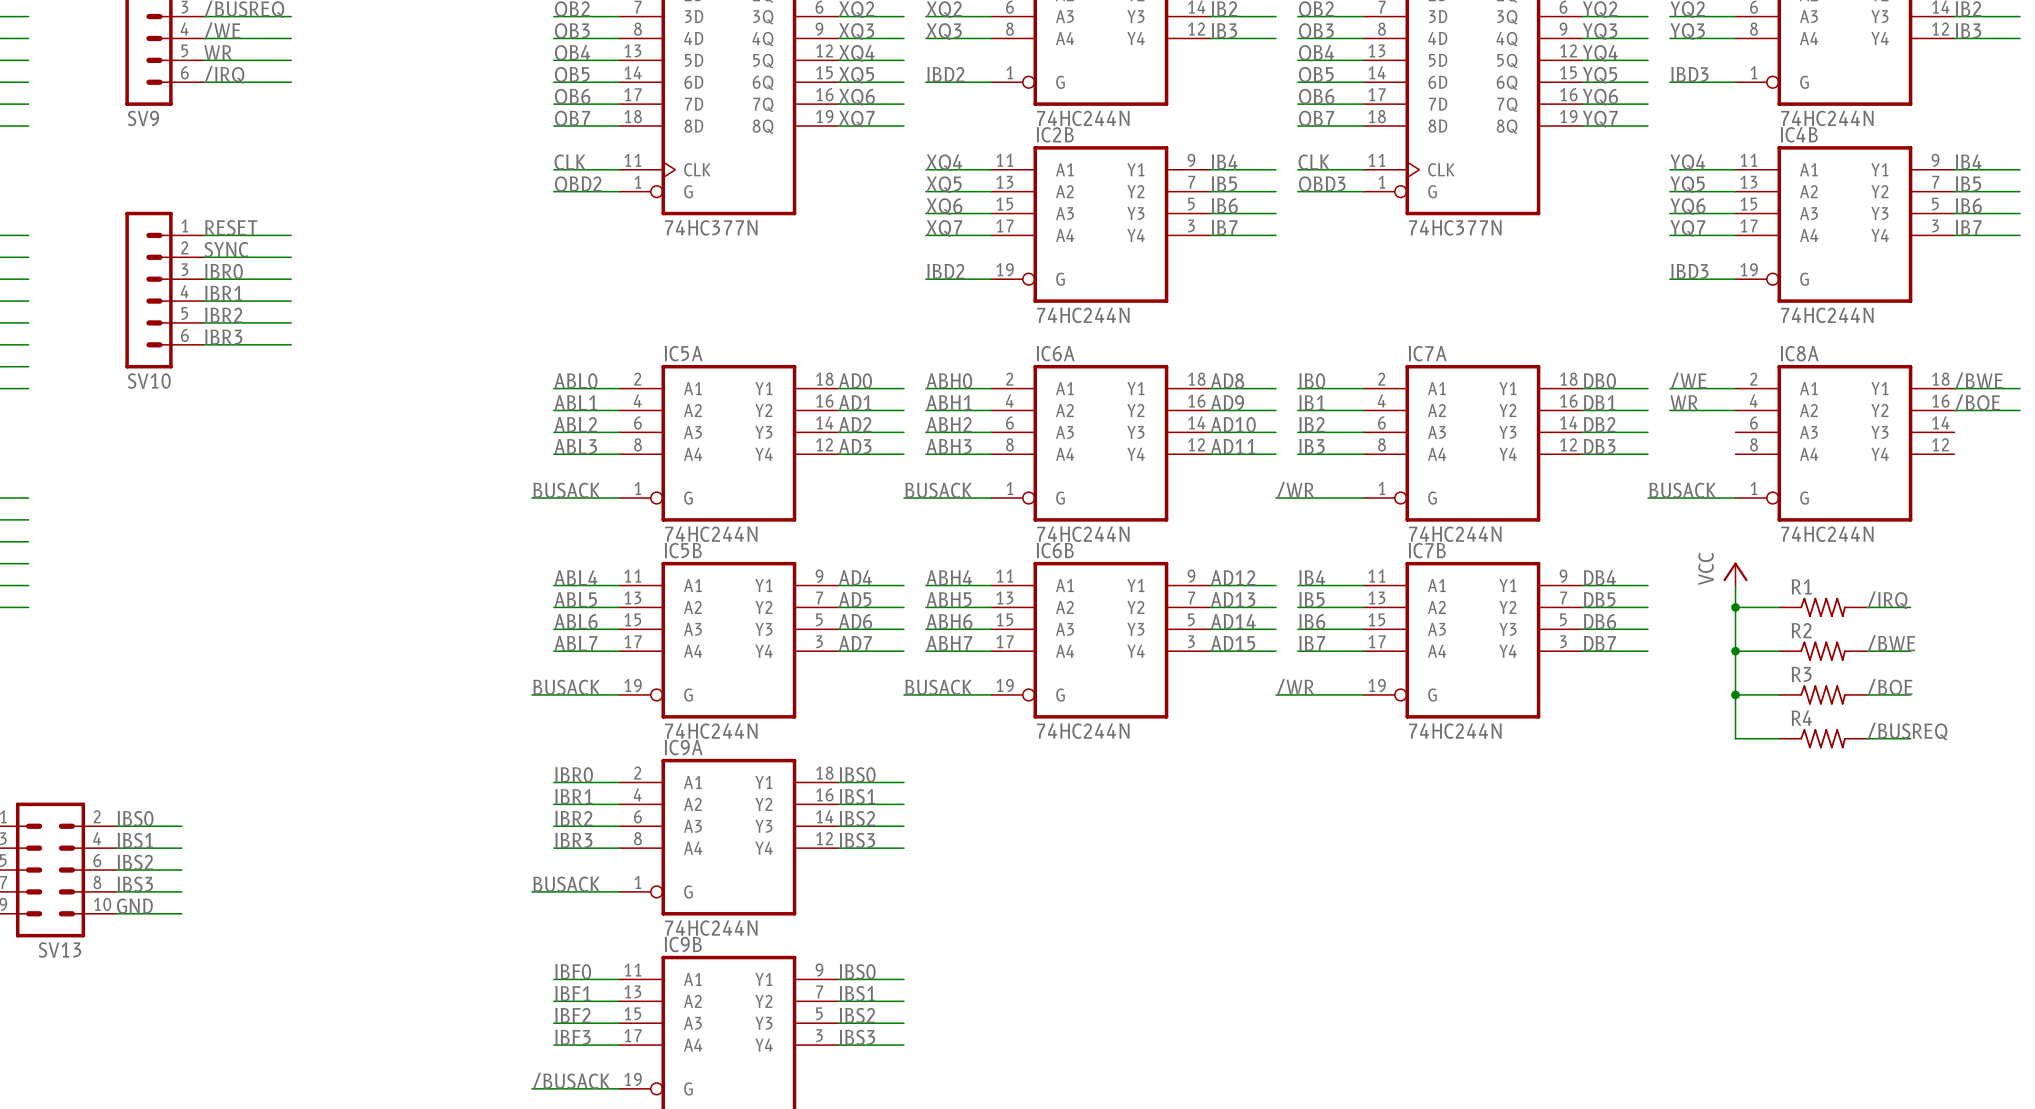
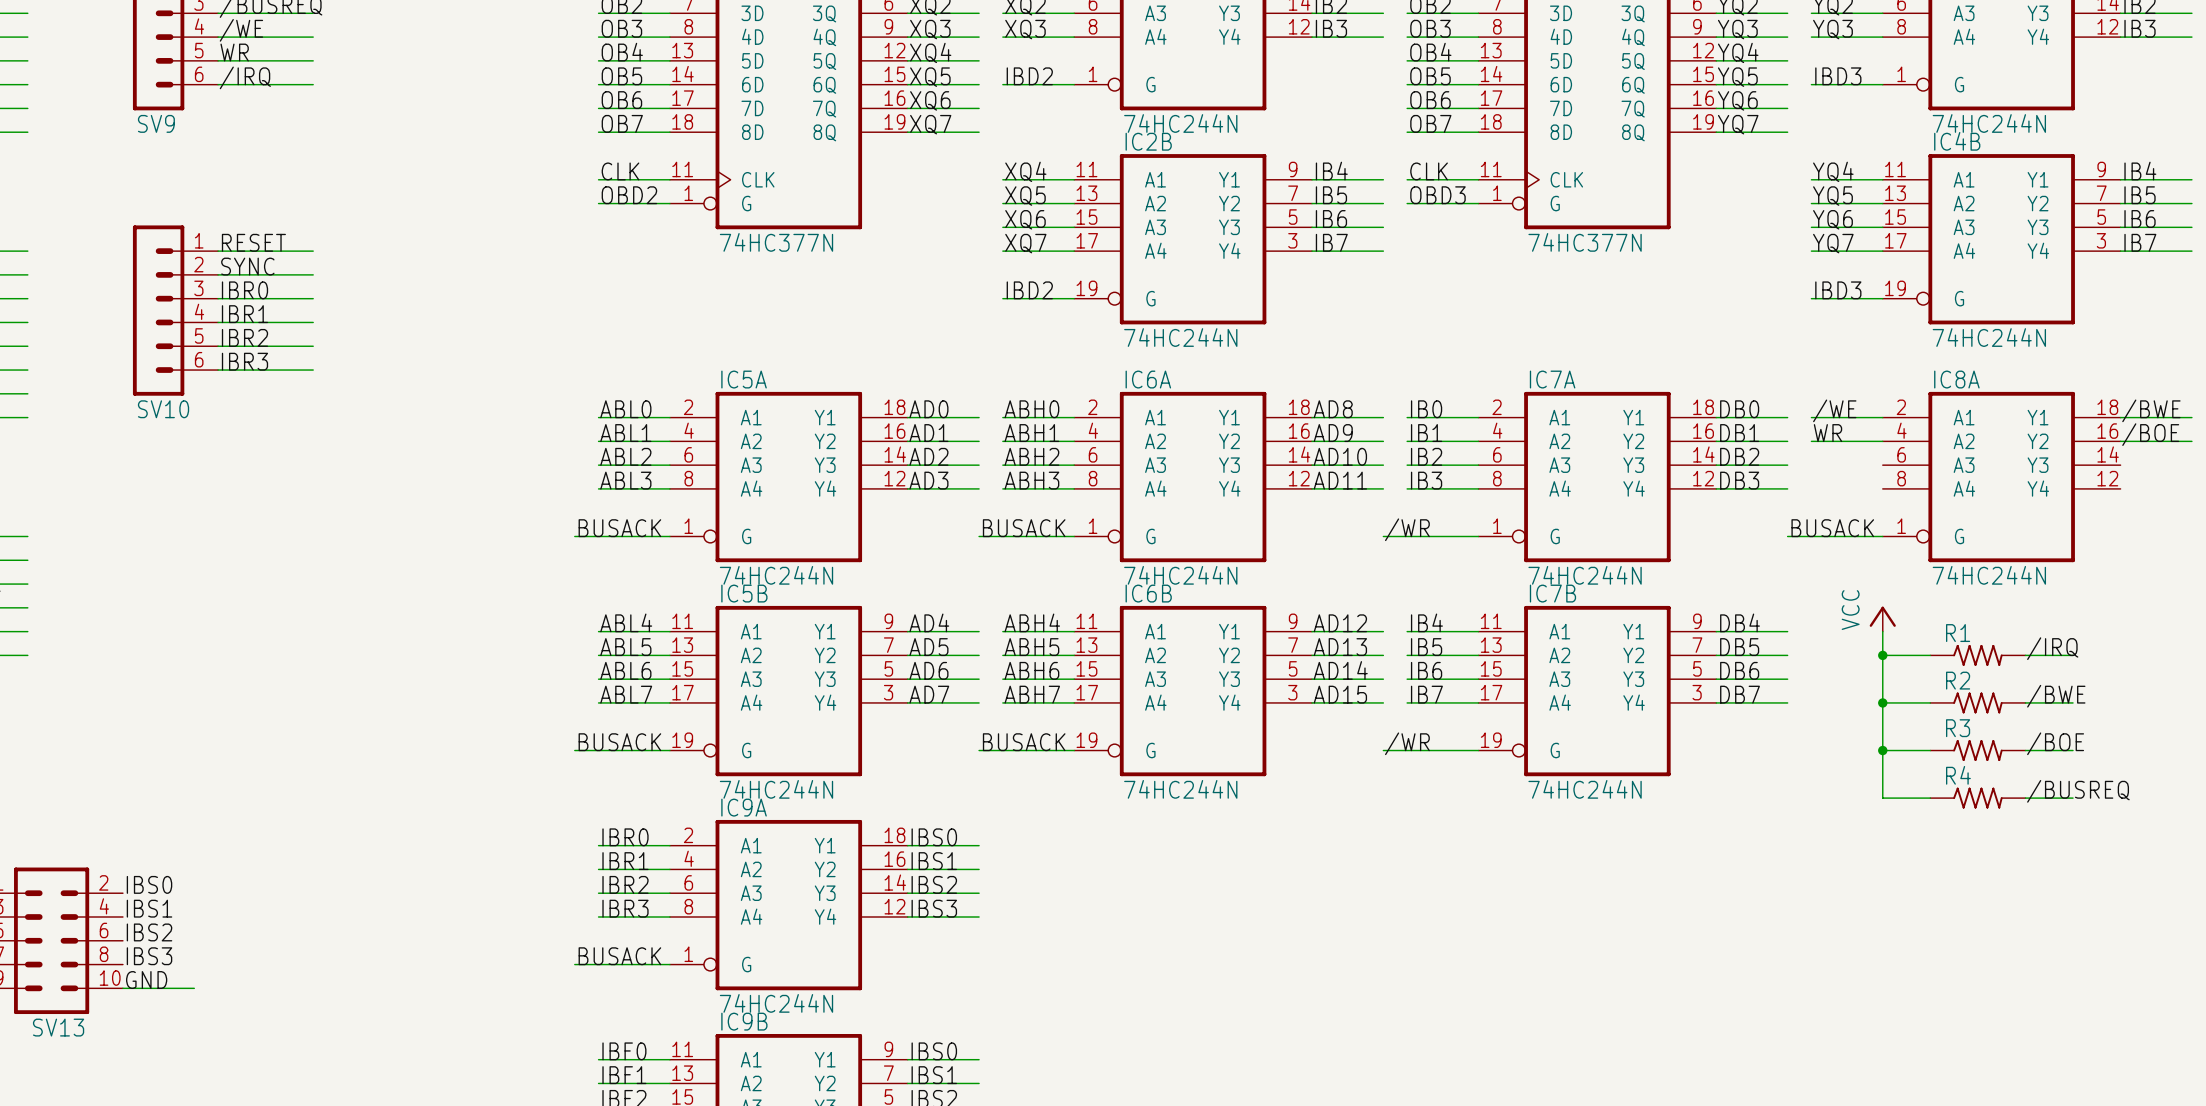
wire: (116, 826) (181, 826) -> none
wire: (116, 848) (181, 848) -> none
wire: (116, 870) (181, 870) -> none
wire: (116, 891) (181, 891) -> none

